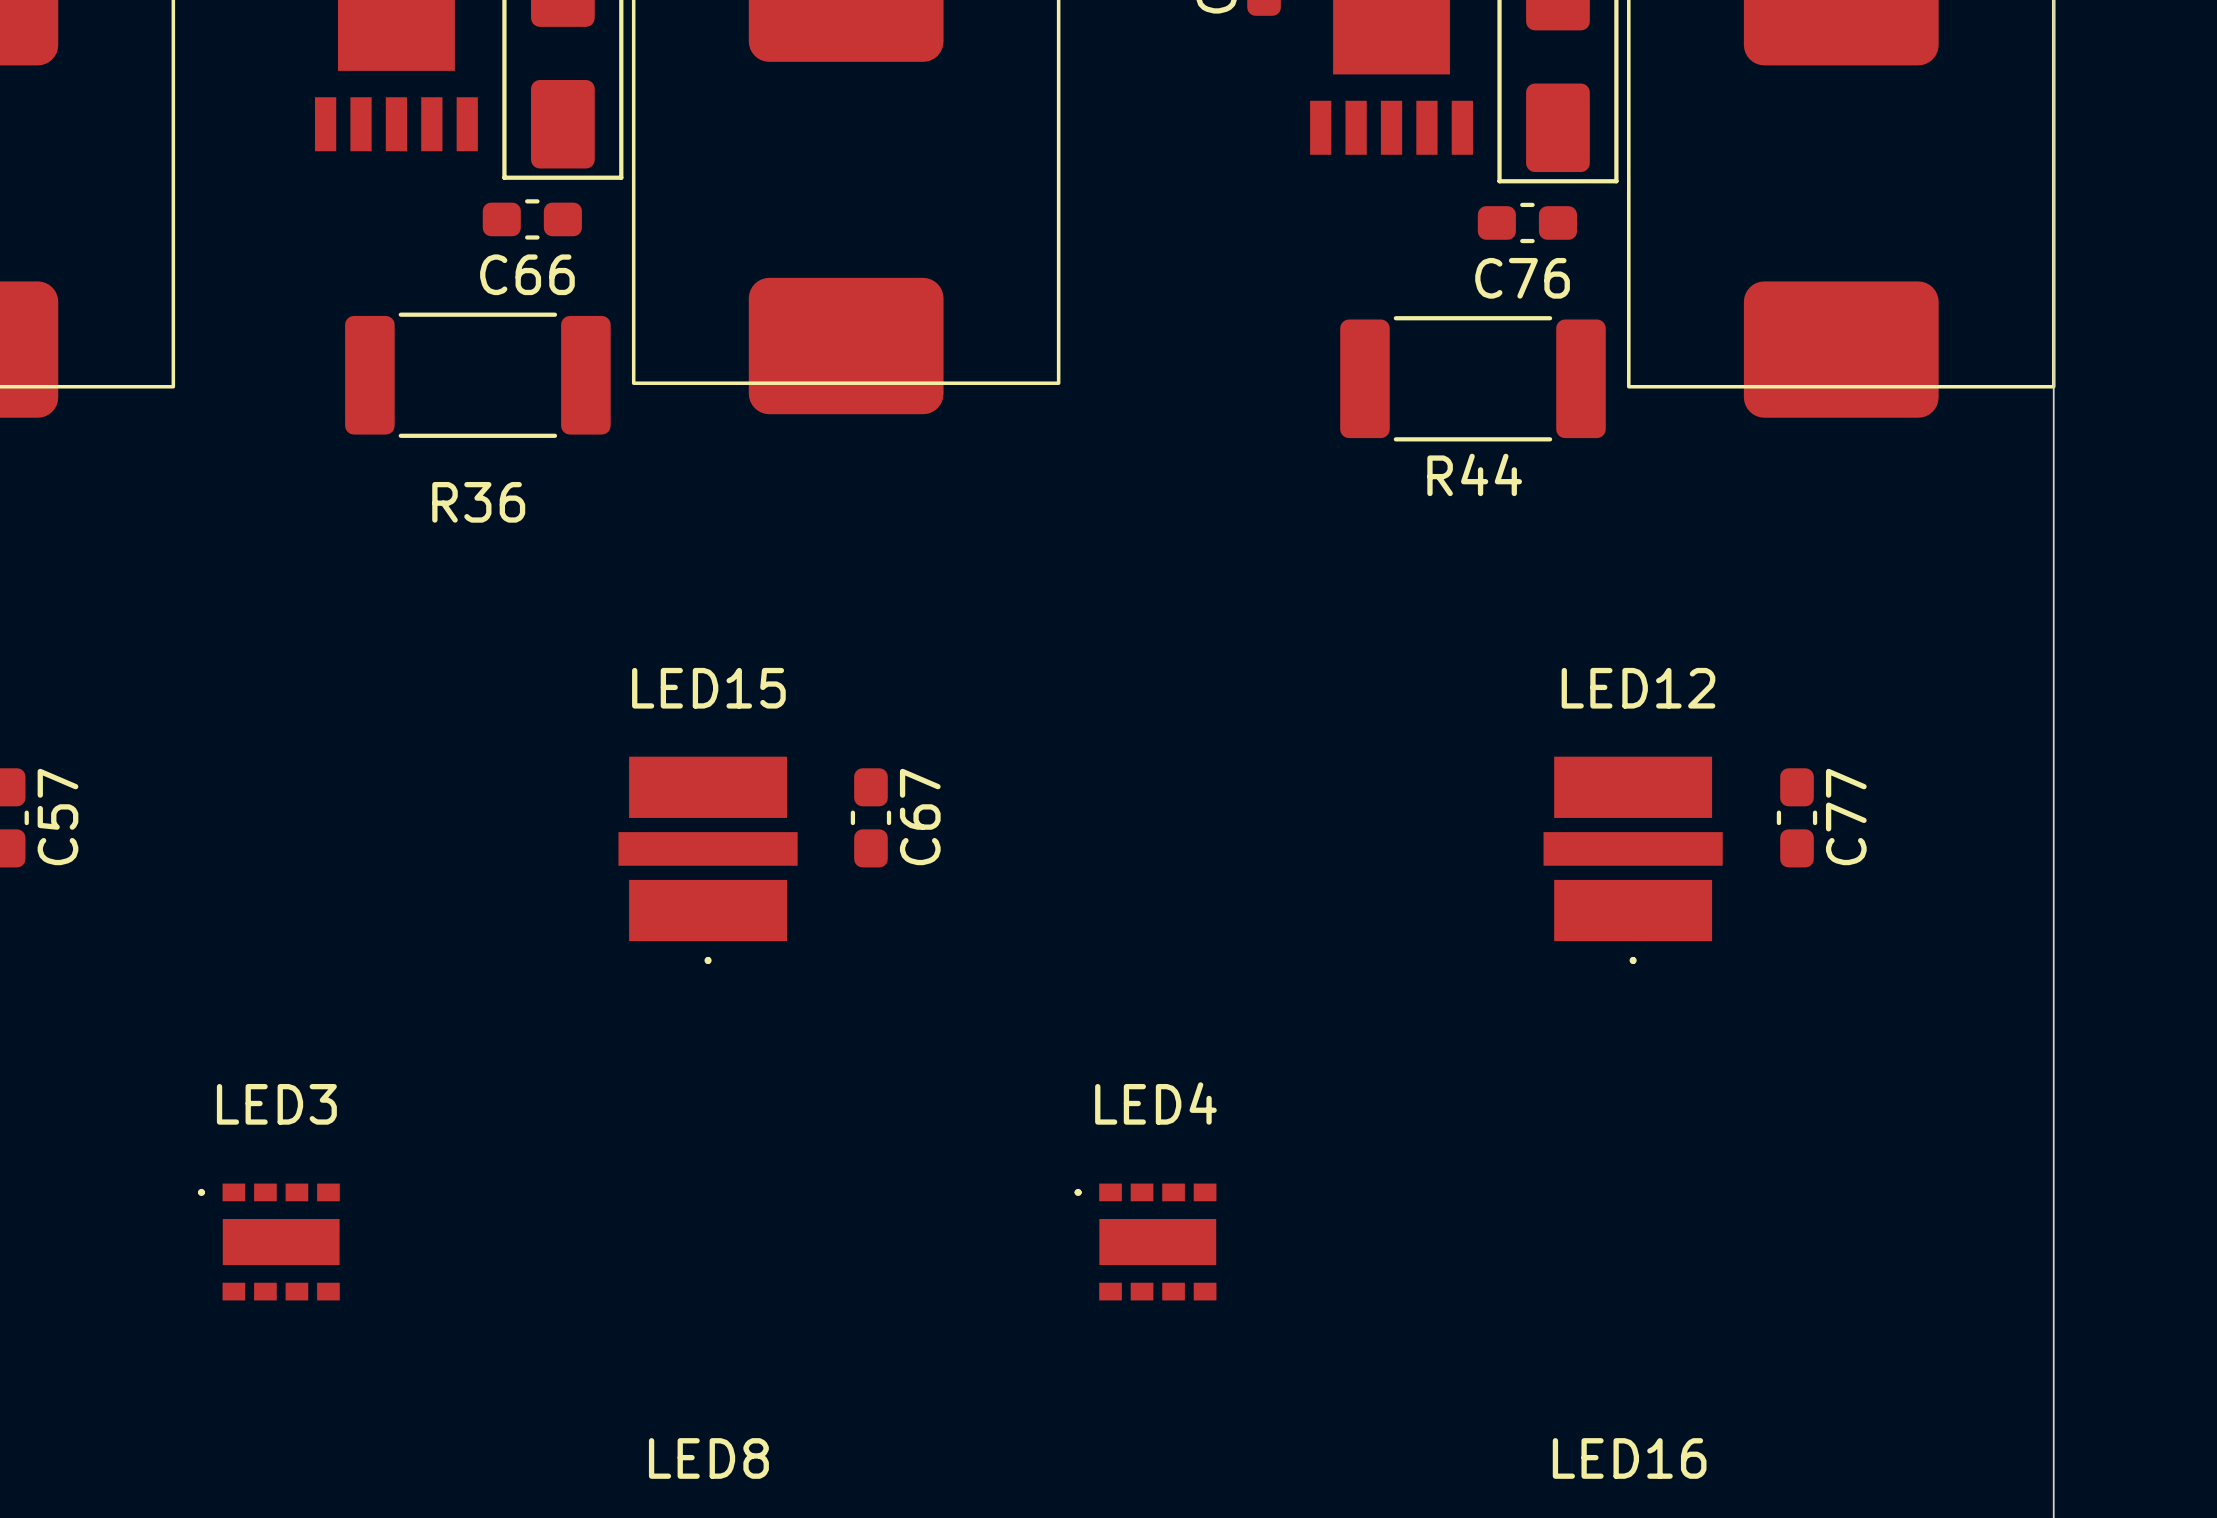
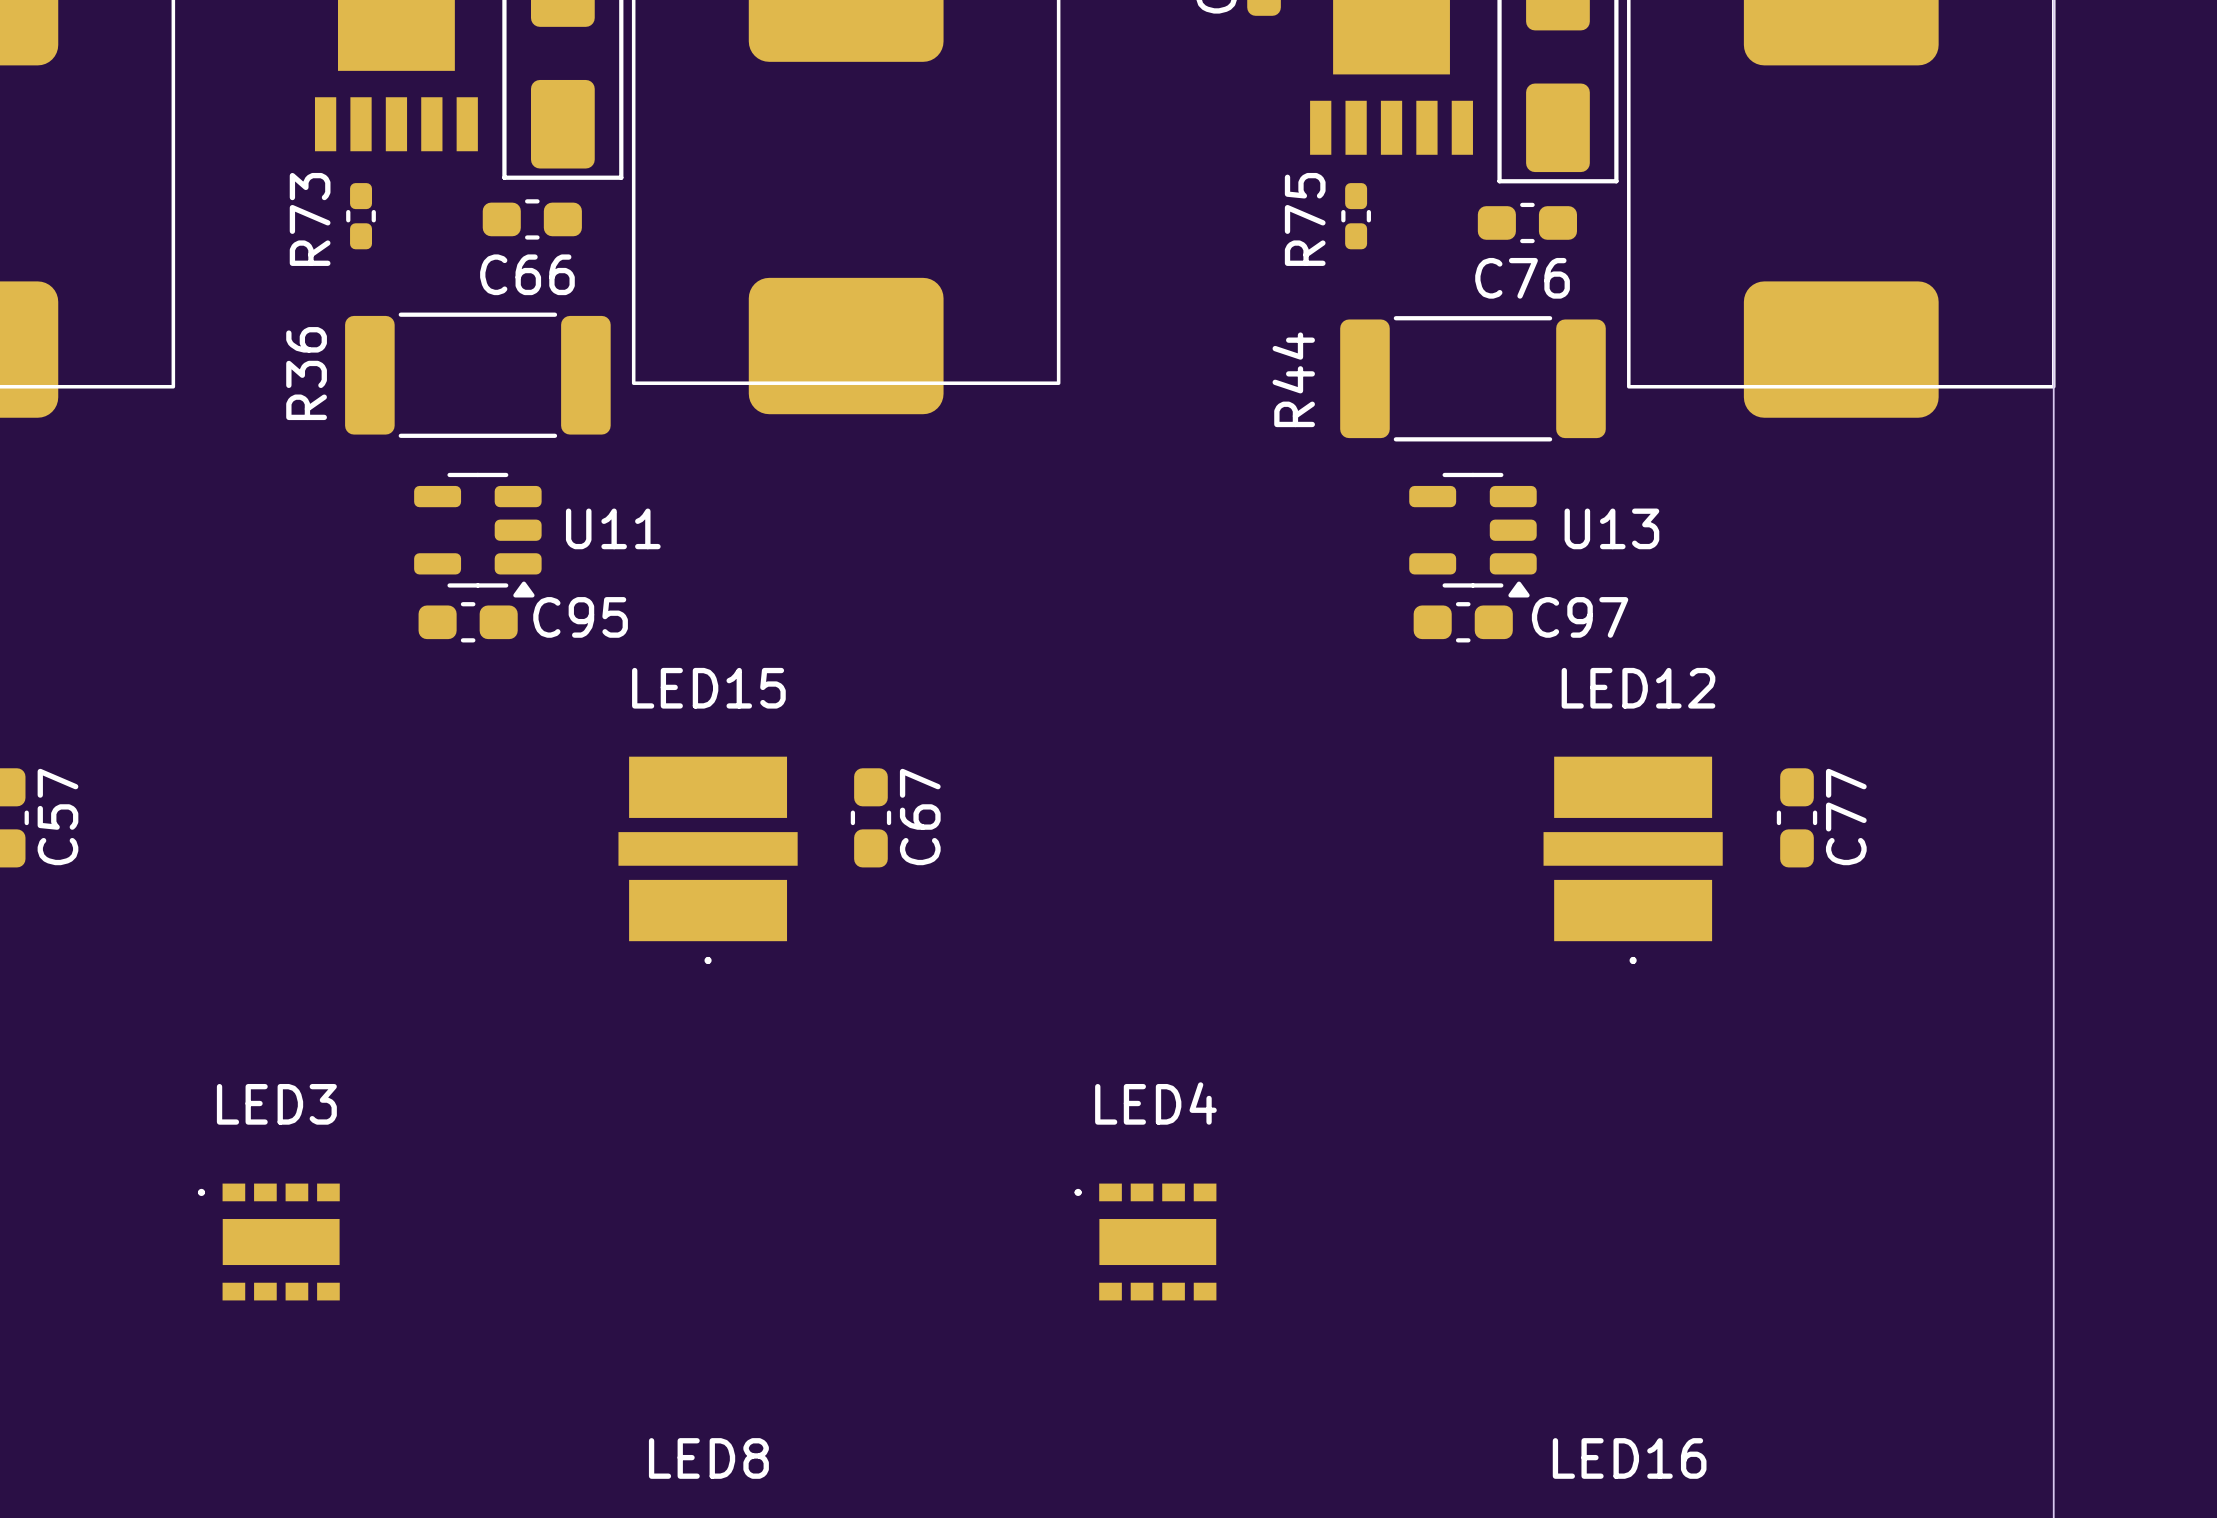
R73: none -> (361, 216)
R75: none -> (1356, 216)
R44 name rotation: 0° (1474, 474) -> 90° counterclockwise (1293, 379)
R44 name position: R44 (1474, 474) -> R44 (1293, 379)
R36 name rotation: 0° (478, 502) -> 90° counterclockwise (306, 373)
R36 name position: R36 (478, 502) -> R36 (306, 373)
U11: none -> (477, 535)
U13: none -> (1472, 535)
C95: none -> (468, 622)
C97: none -> (1463, 622)

